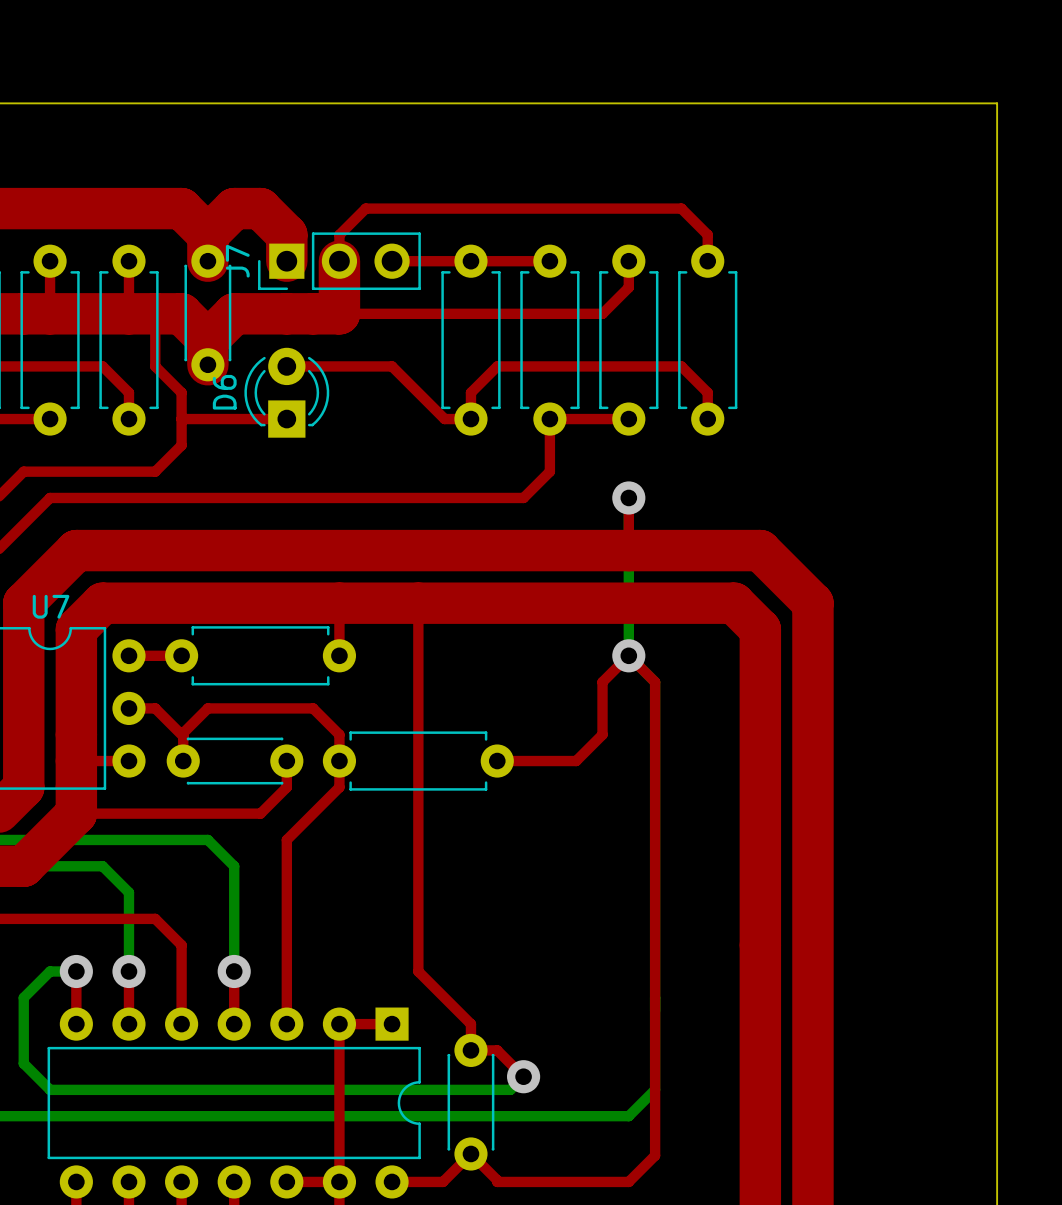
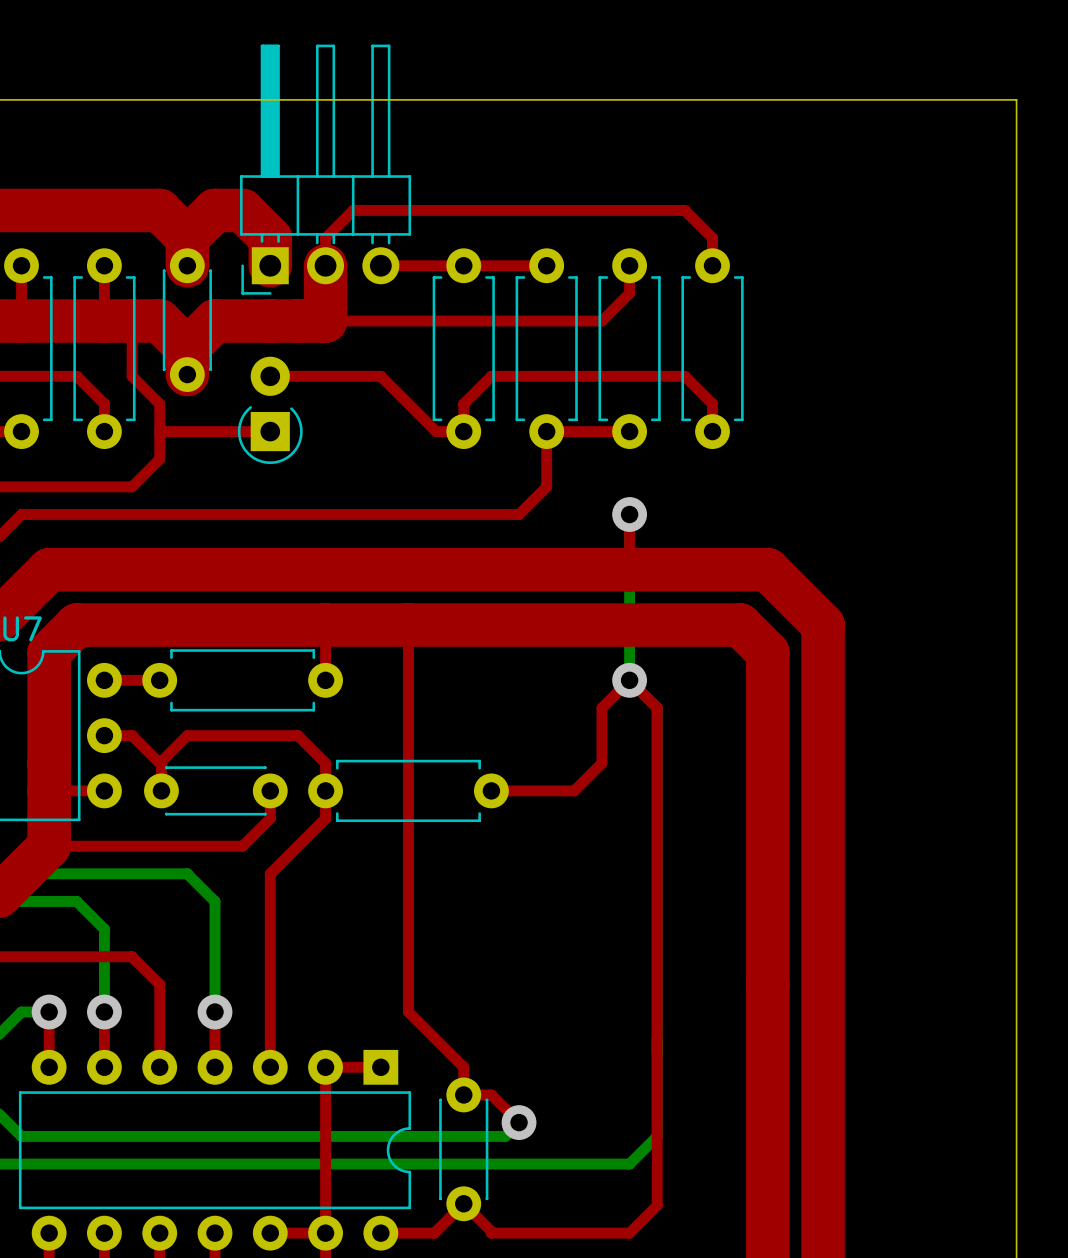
part: none -> (325, 169)
J7: (339, 261) -> none
D6: (286, 392) -> none
part: none -> (270, 410)

